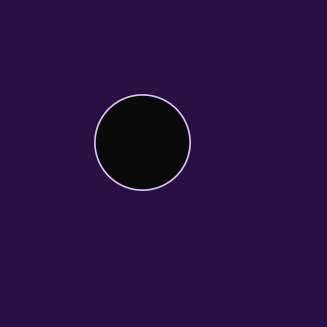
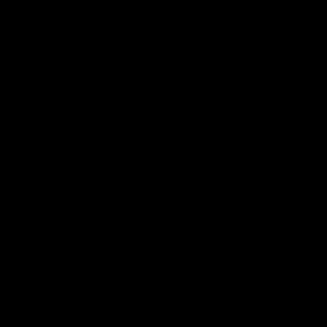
part: (142, 142) -> none

